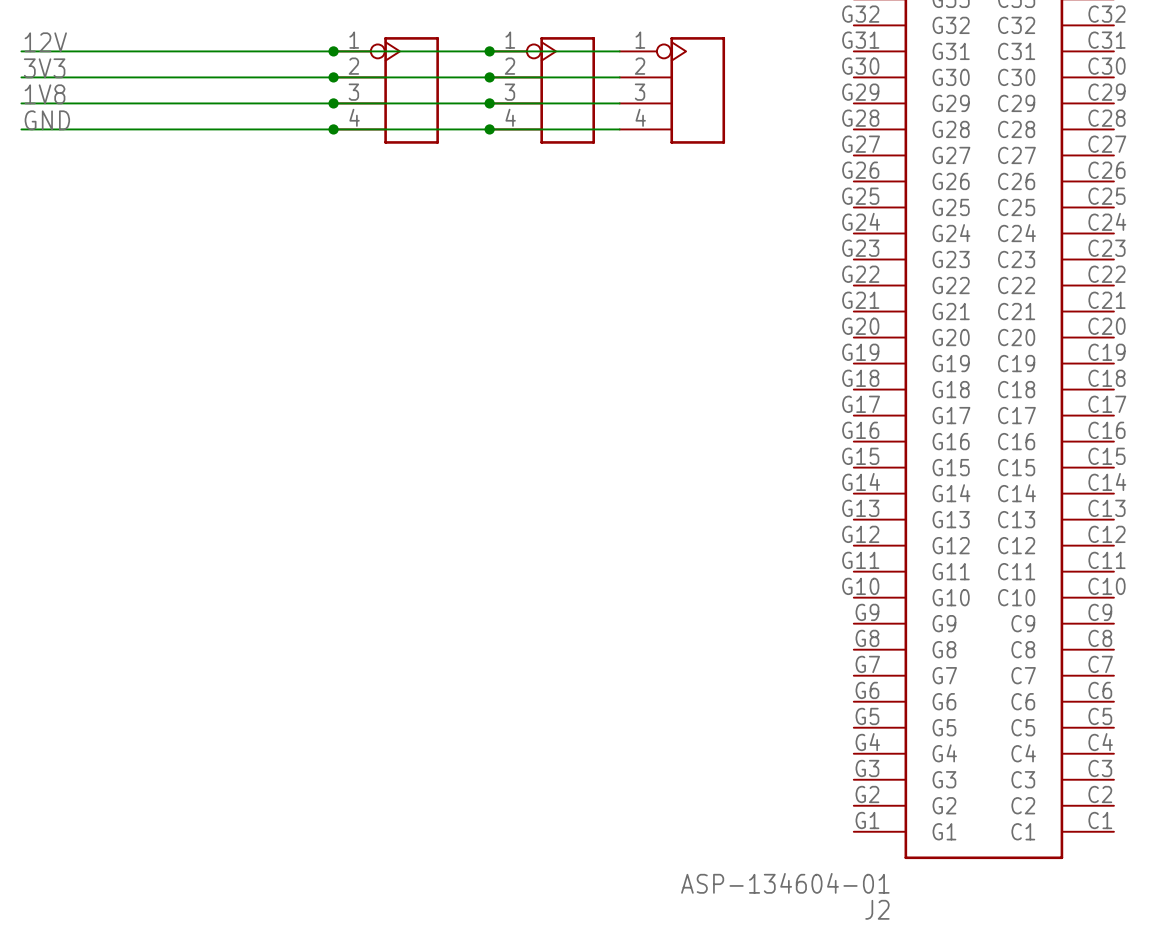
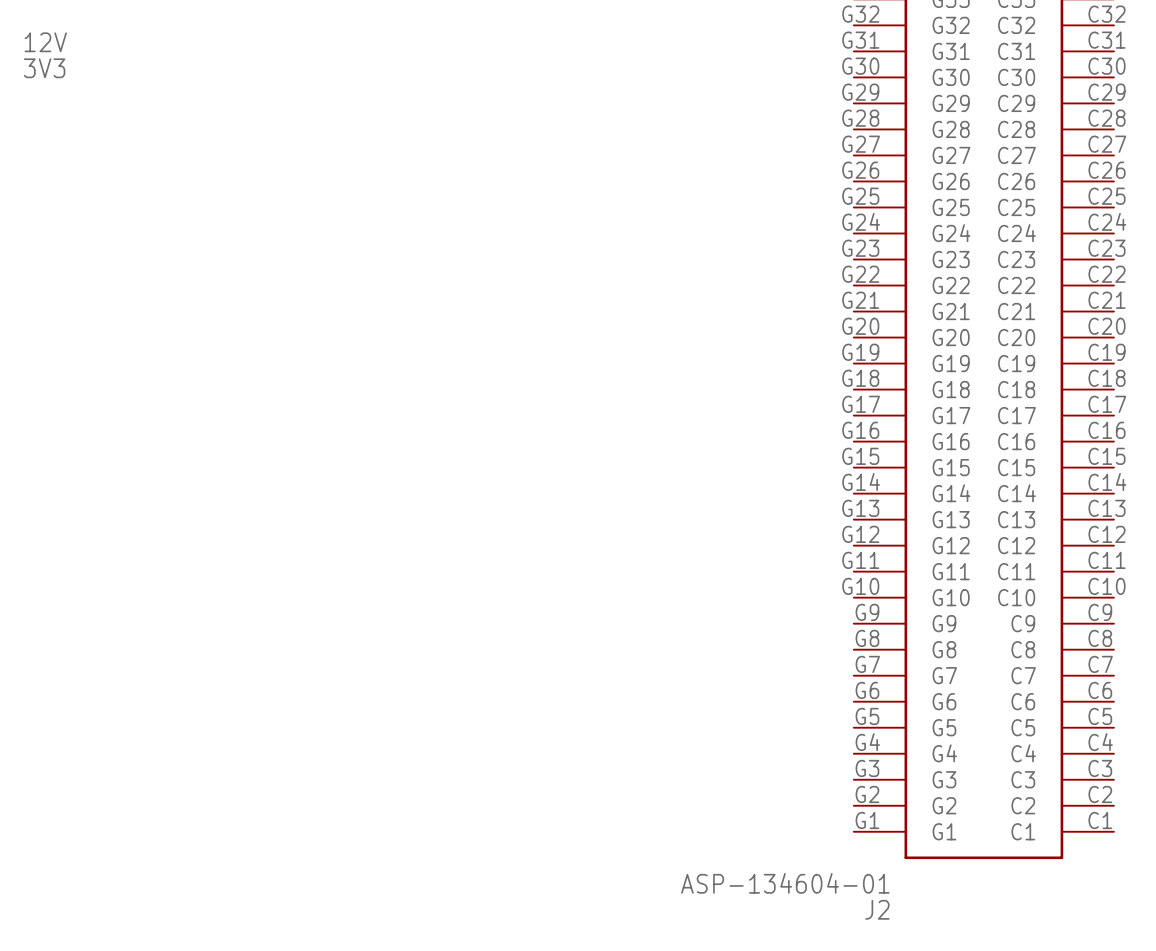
wire: (21, 51) (619, 51) -> none
junction: (333, 51) -> none
junction: (489, 51) -> none
wire: (21, 77) (619, 77) -> none
junction: (333, 77) -> none
junction: (489, 77) -> none
part: (386, 90) -> none
part: (542, 90) -> none
part: (672, 90) -> none
label: 1V8 (45, 94) -> none
wire: (21, 103) (619, 103) -> none
junction: (333, 103) -> none
junction: (489, 103) -> none
label: GND (47, 120) -> none
wire: (21, 129) (619, 129) -> none
junction: (333, 129) -> none
junction: (489, 129) -> none

